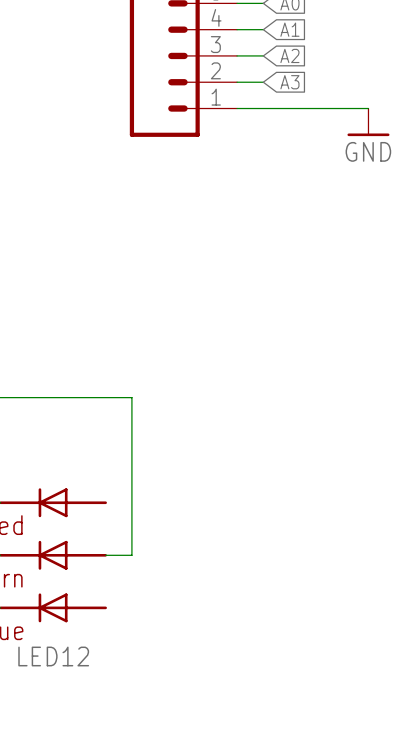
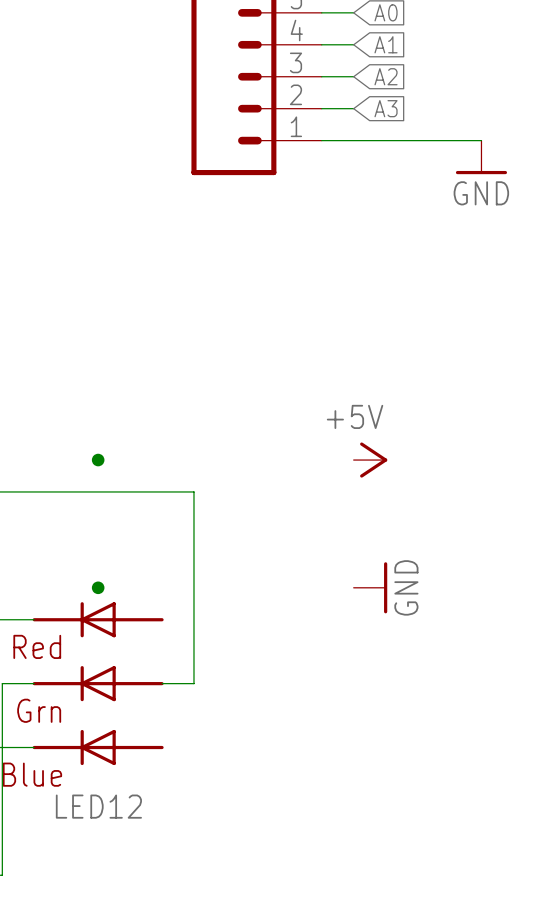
junction: none -> (98, 460)
power symbol: none -> +5V (370, 460)
junction: none -> (98, 587)
power symbol: none -> GND (370, 587)

